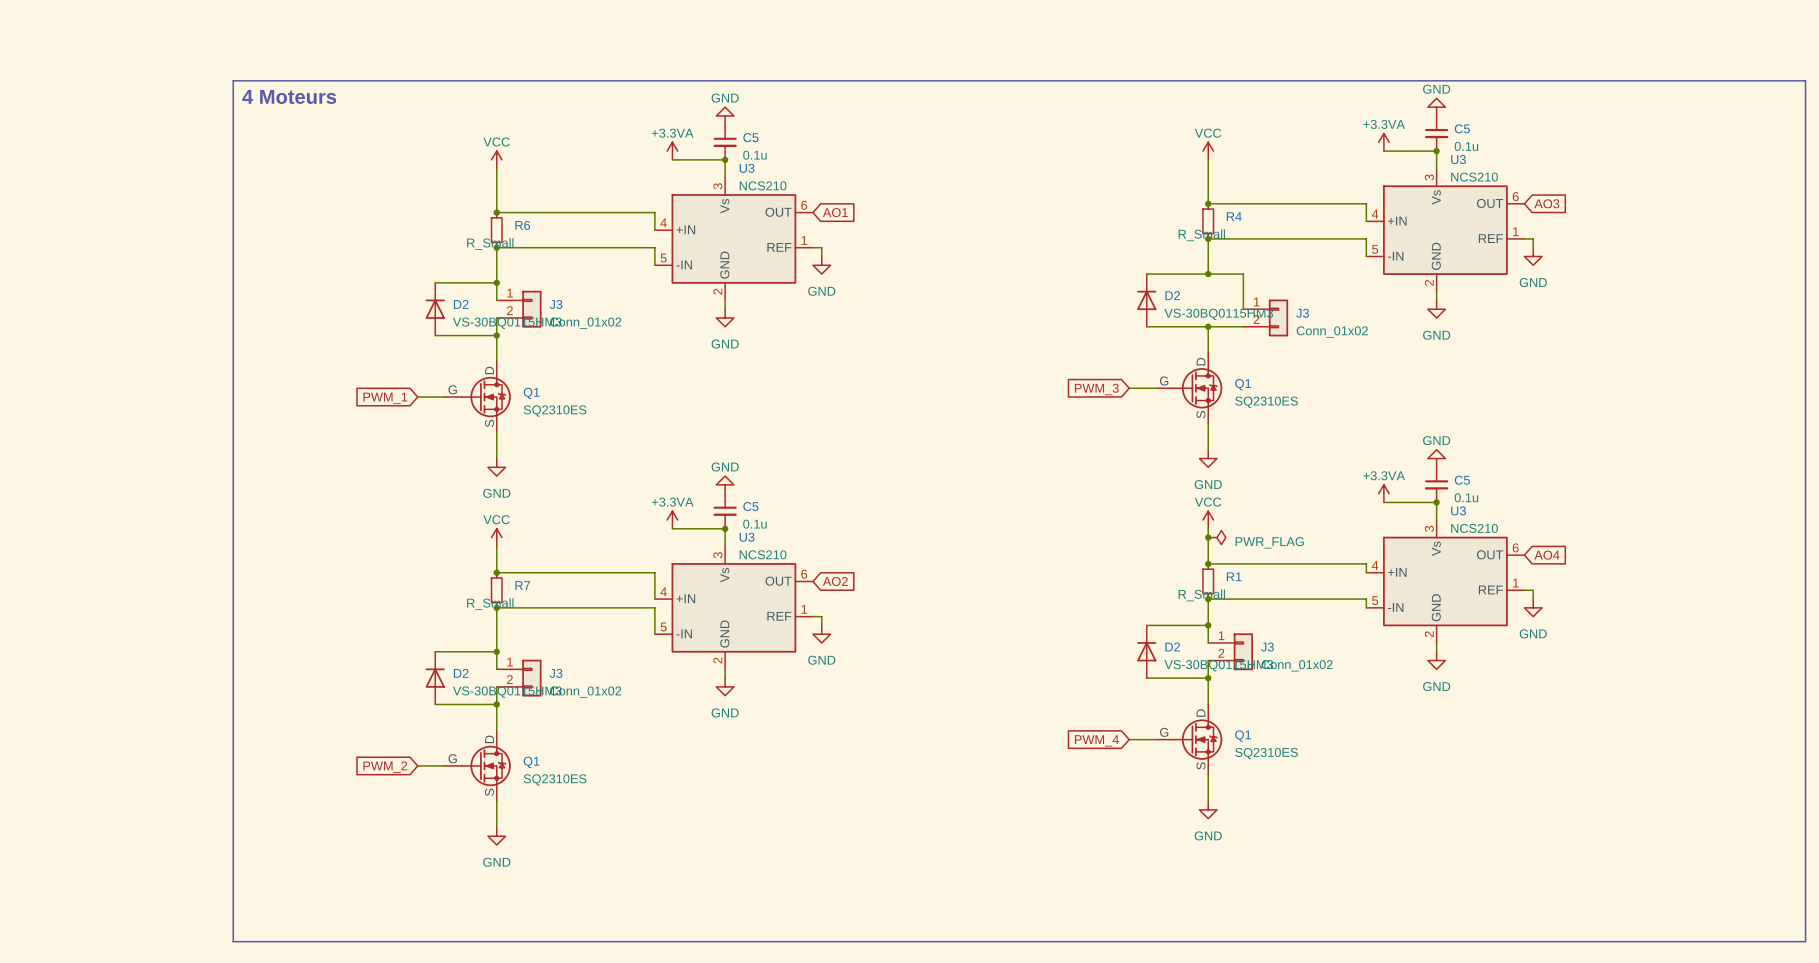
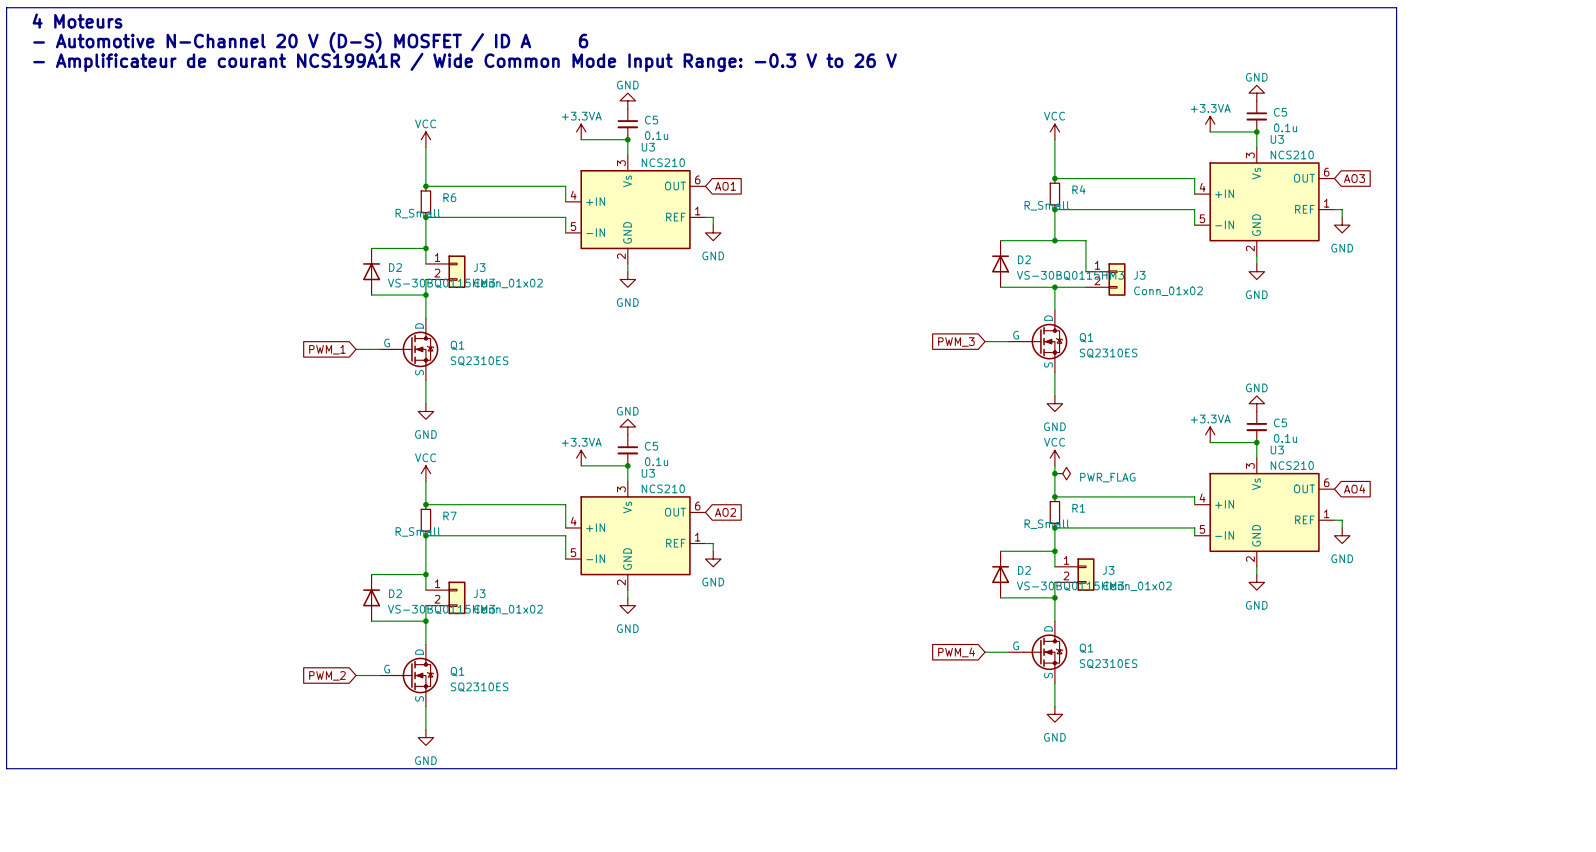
text: none -> 4 Moteurs (77, 21)
text: none -> - Automotive N-Channel 20 V (D-S) MOSFET / ID A 6 (310, 42)
text: none -> - Amplificateur de courant NCS199A1R / Wide Common Mode Input Range: −0.3 V to 26 V (465, 62)
bus: (233, 80) (1805, 80) (1805, 941) (233, 941) (233, 80) -> (6, 7) (1396, 7) (1396, 768) (6, 768) (6, 7)
text: 4 Moteurs (289, 96) -> none

